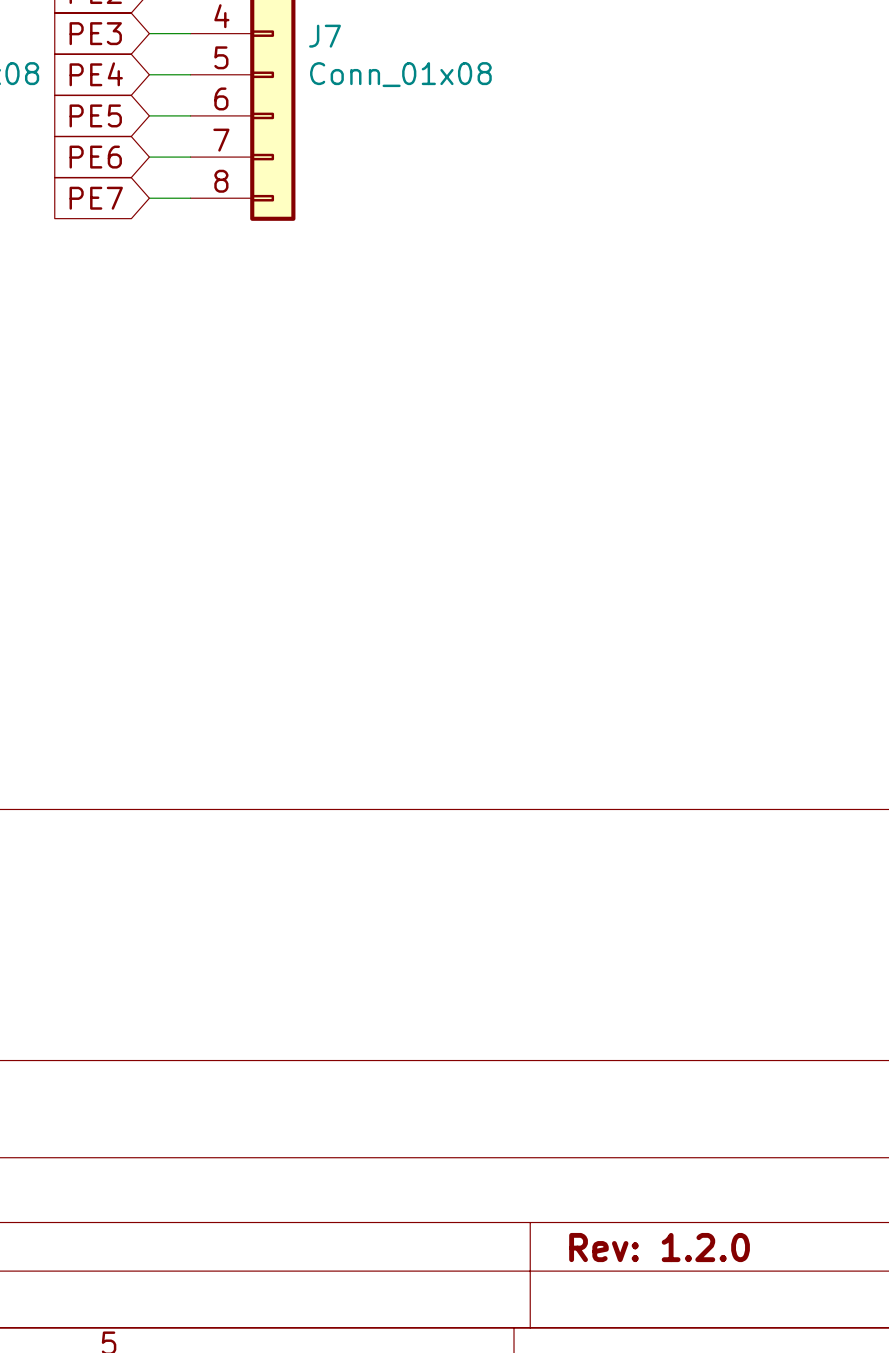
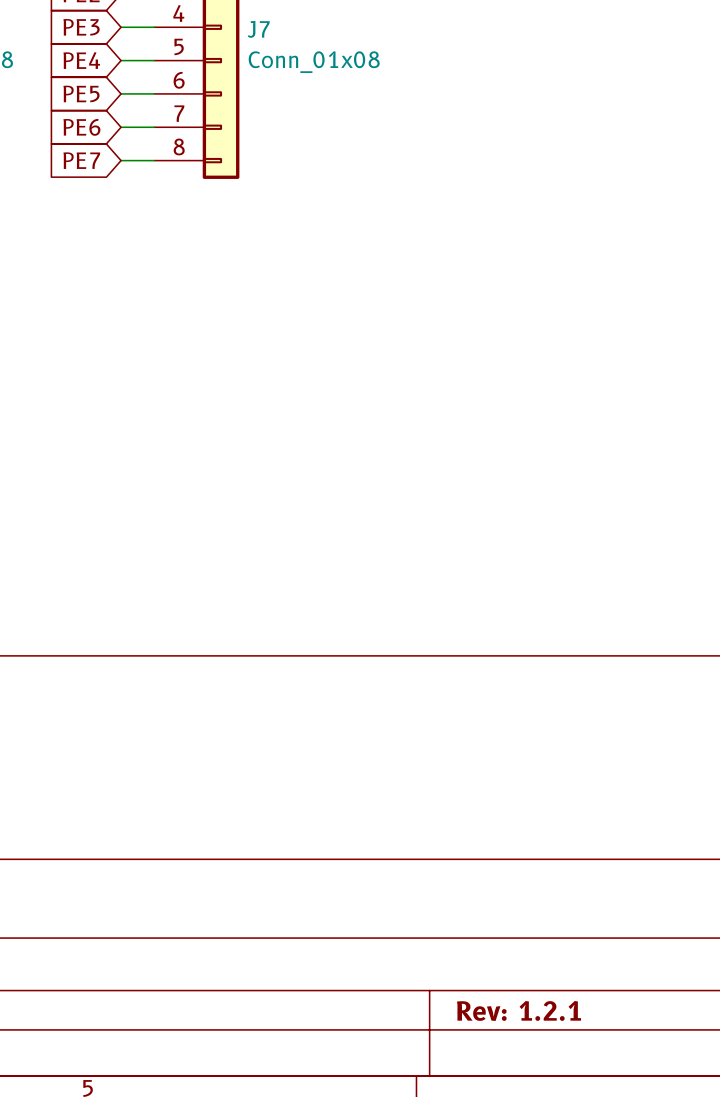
title block: Rev: 1.2.0 (659, 1247) -> Rev: 1.2.1 (518, 1010)

